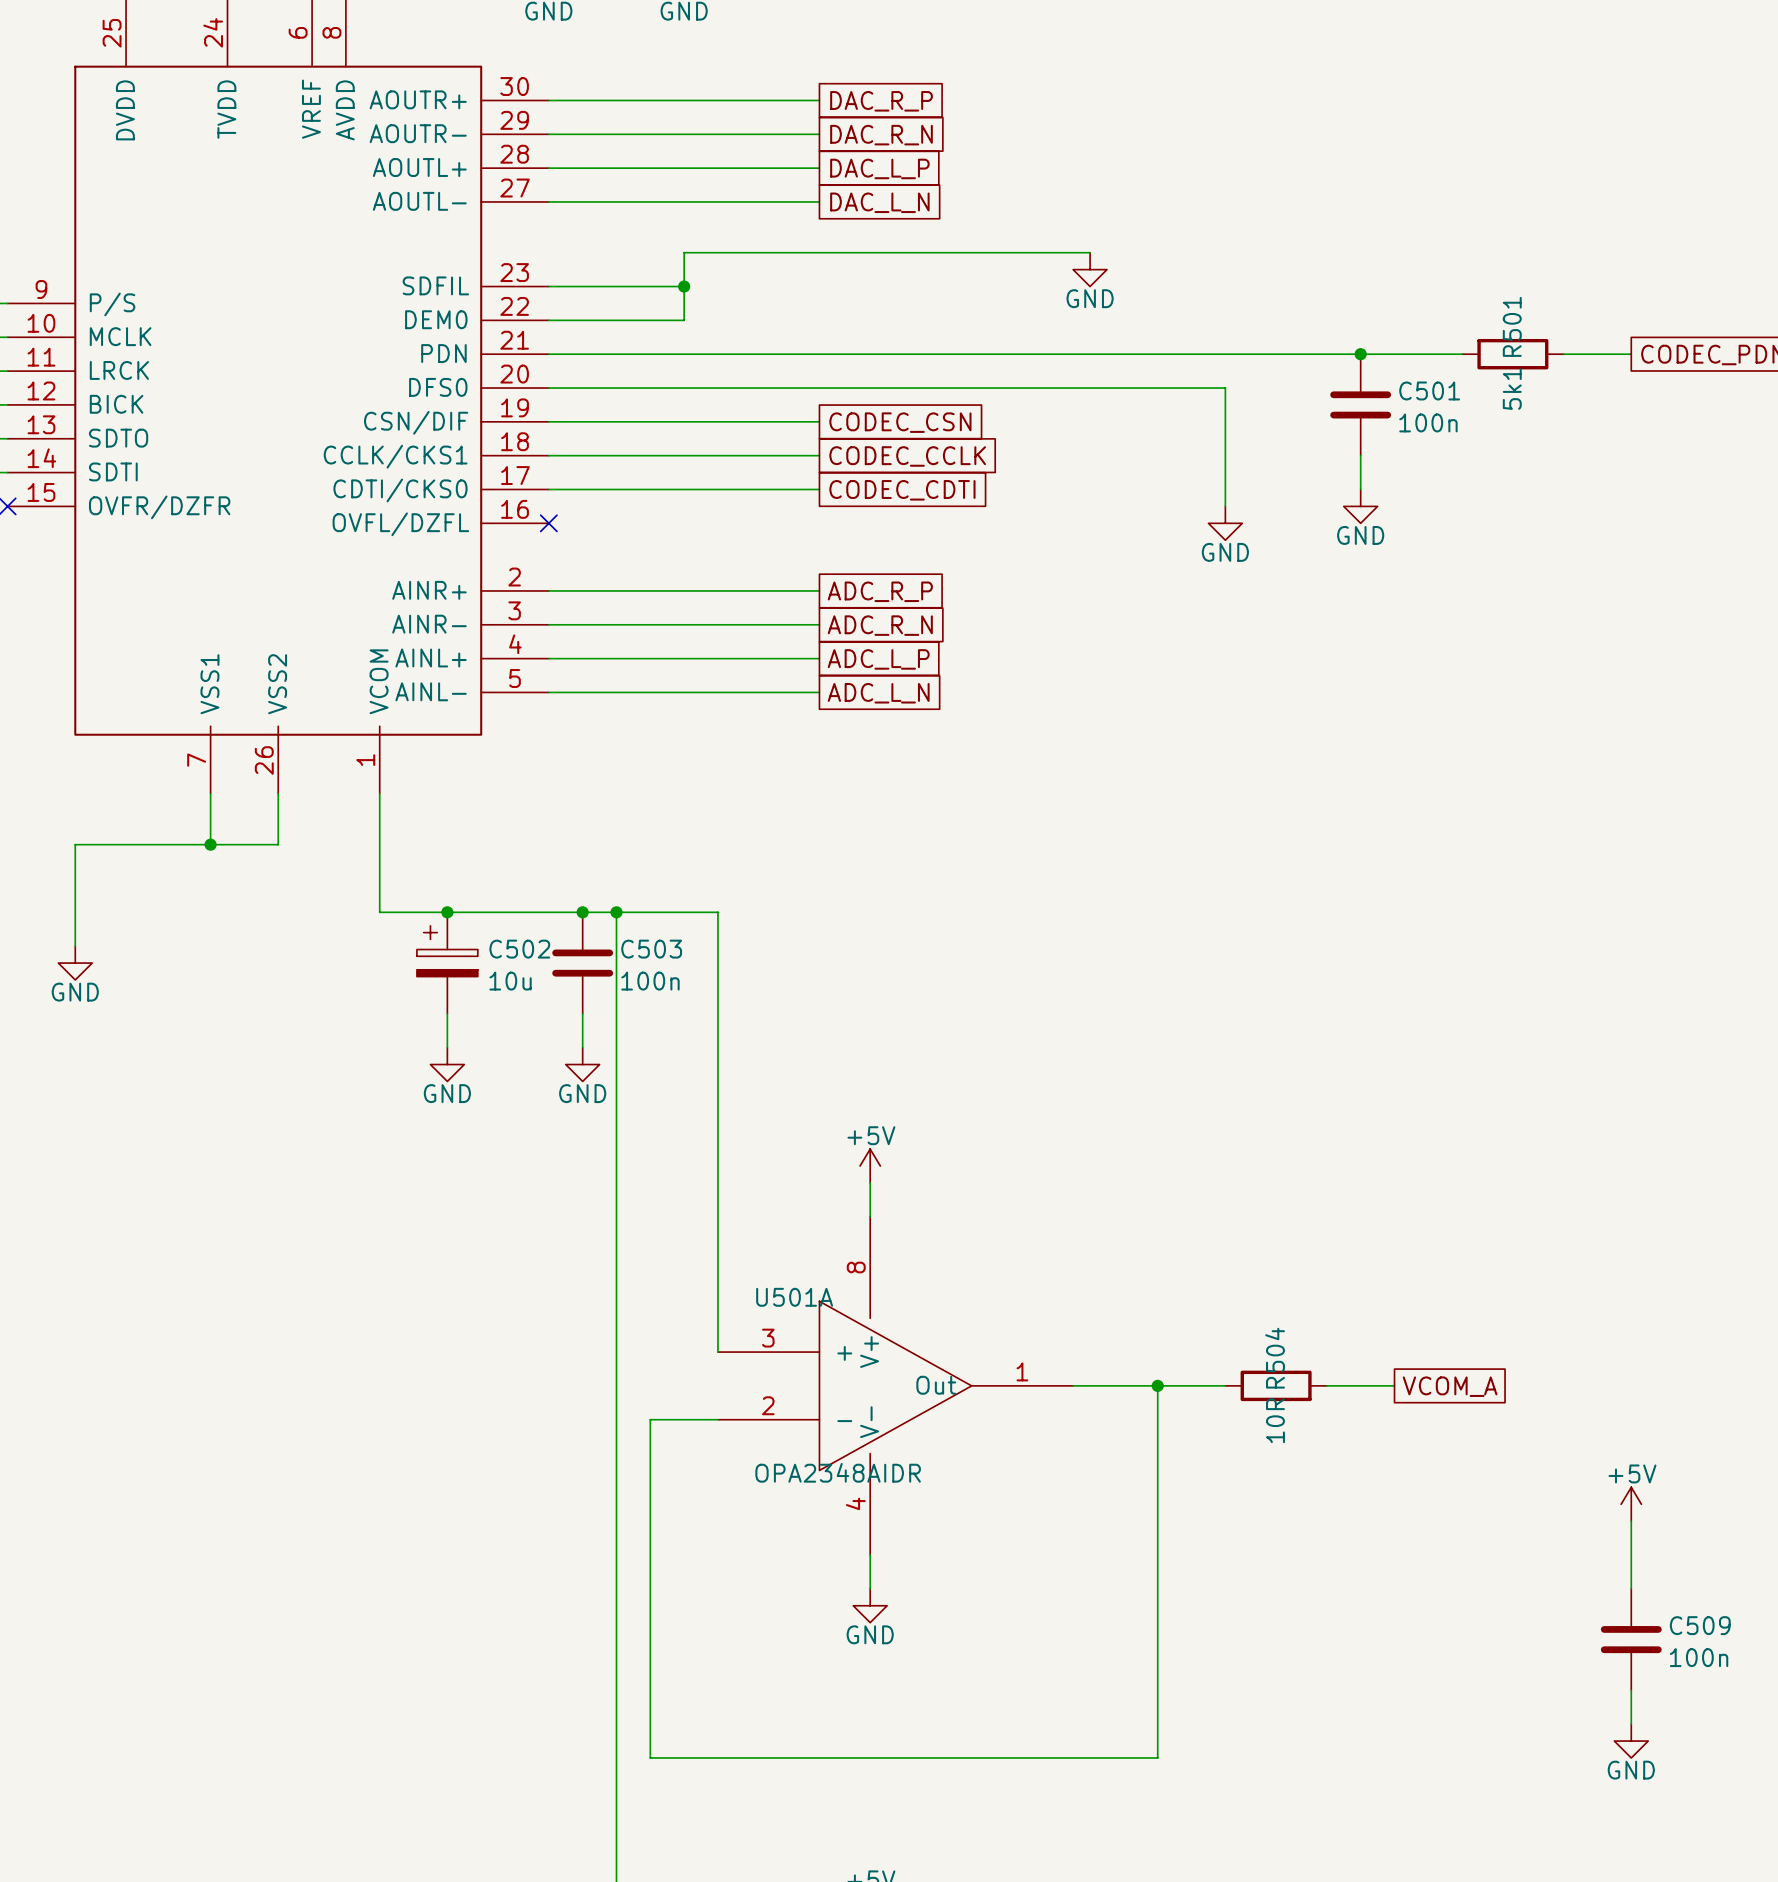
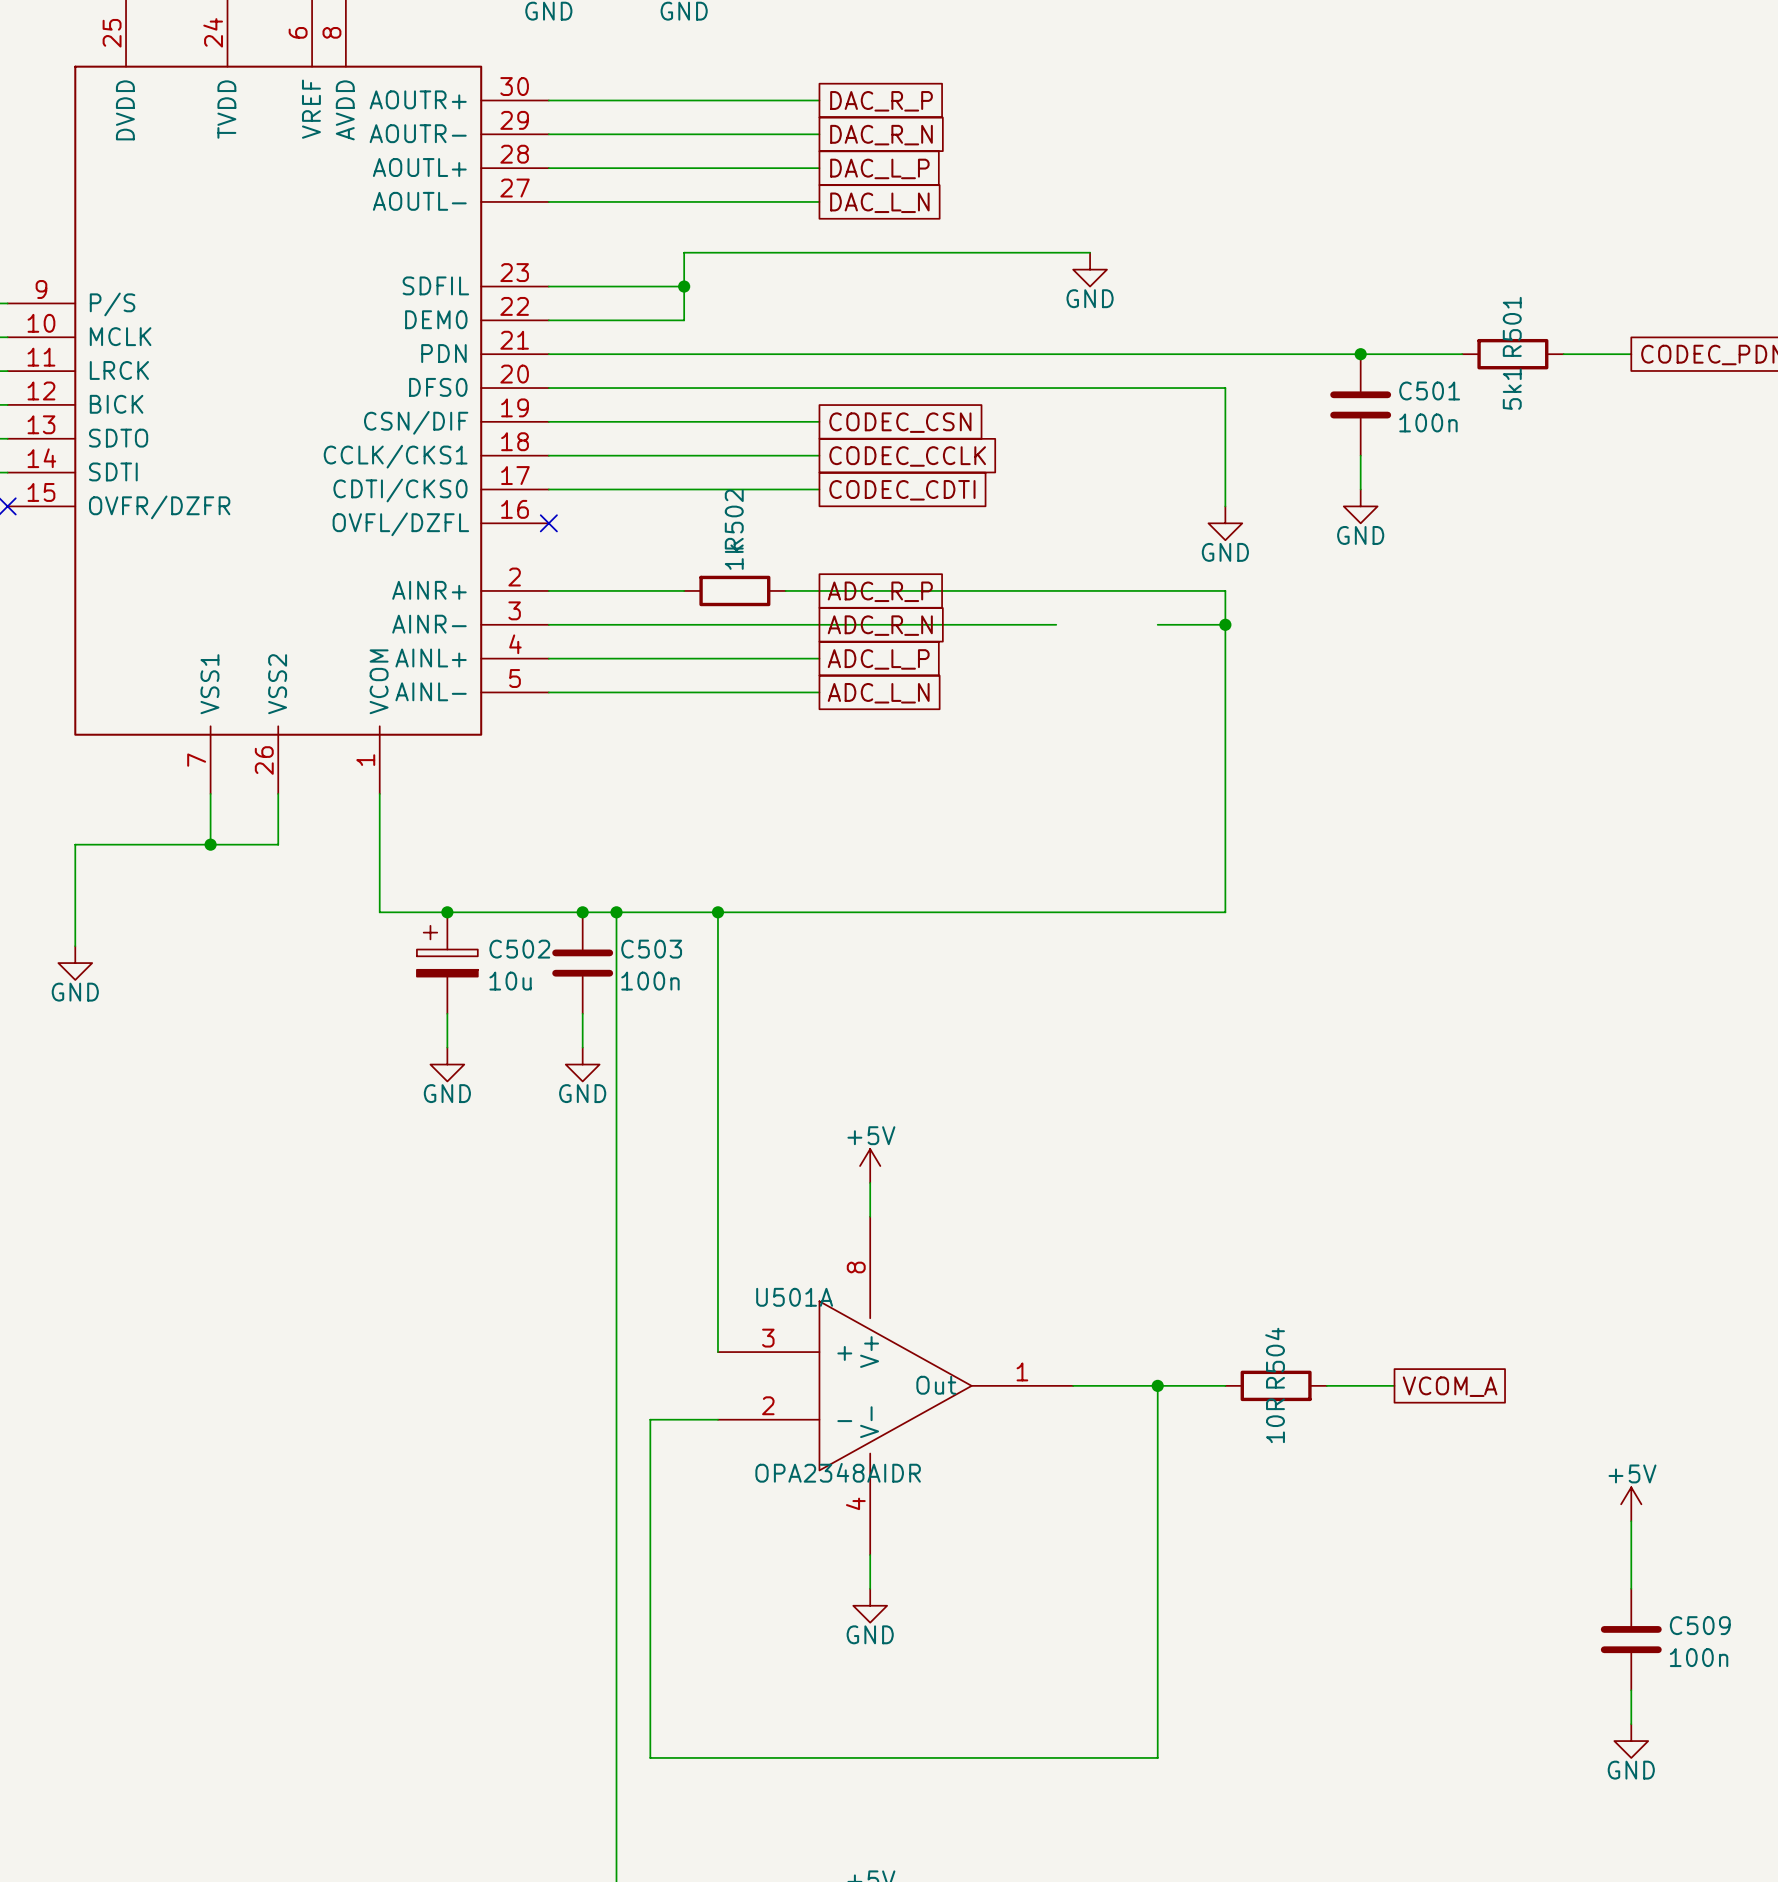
wire: (684, 590) (785, 590) -> none
R502: none -> 1k (734, 590)
wire: none -> (819, 590) (1225, 590) (1225, 912) (717, 912)
wire: none -> (819, 624) (1056, 624)
wire: none -> (1157, 624) (1225, 624)
junction: none -> (1225, 624)
junction: none -> (717, 912)

